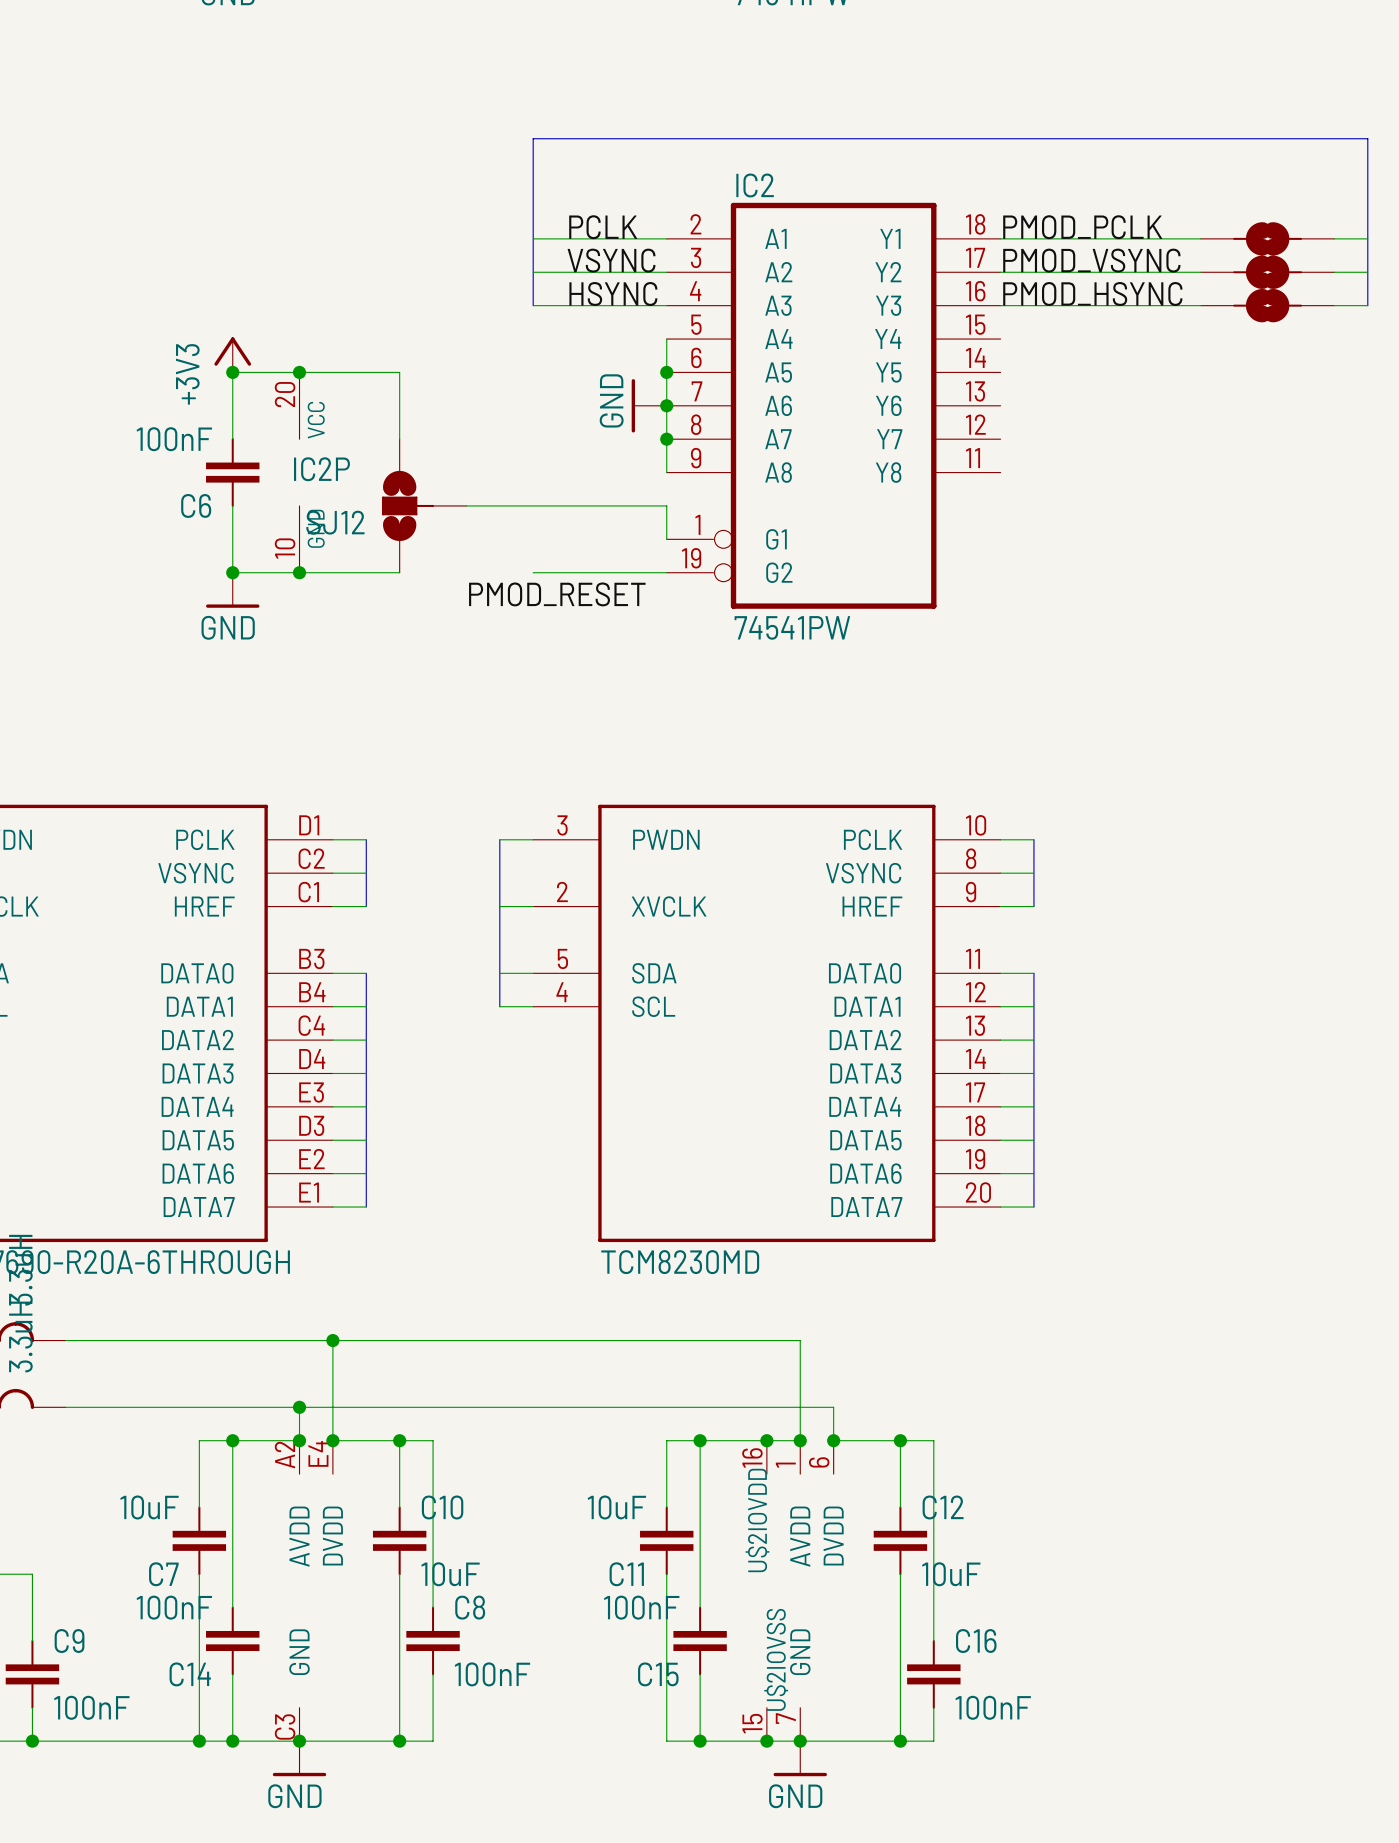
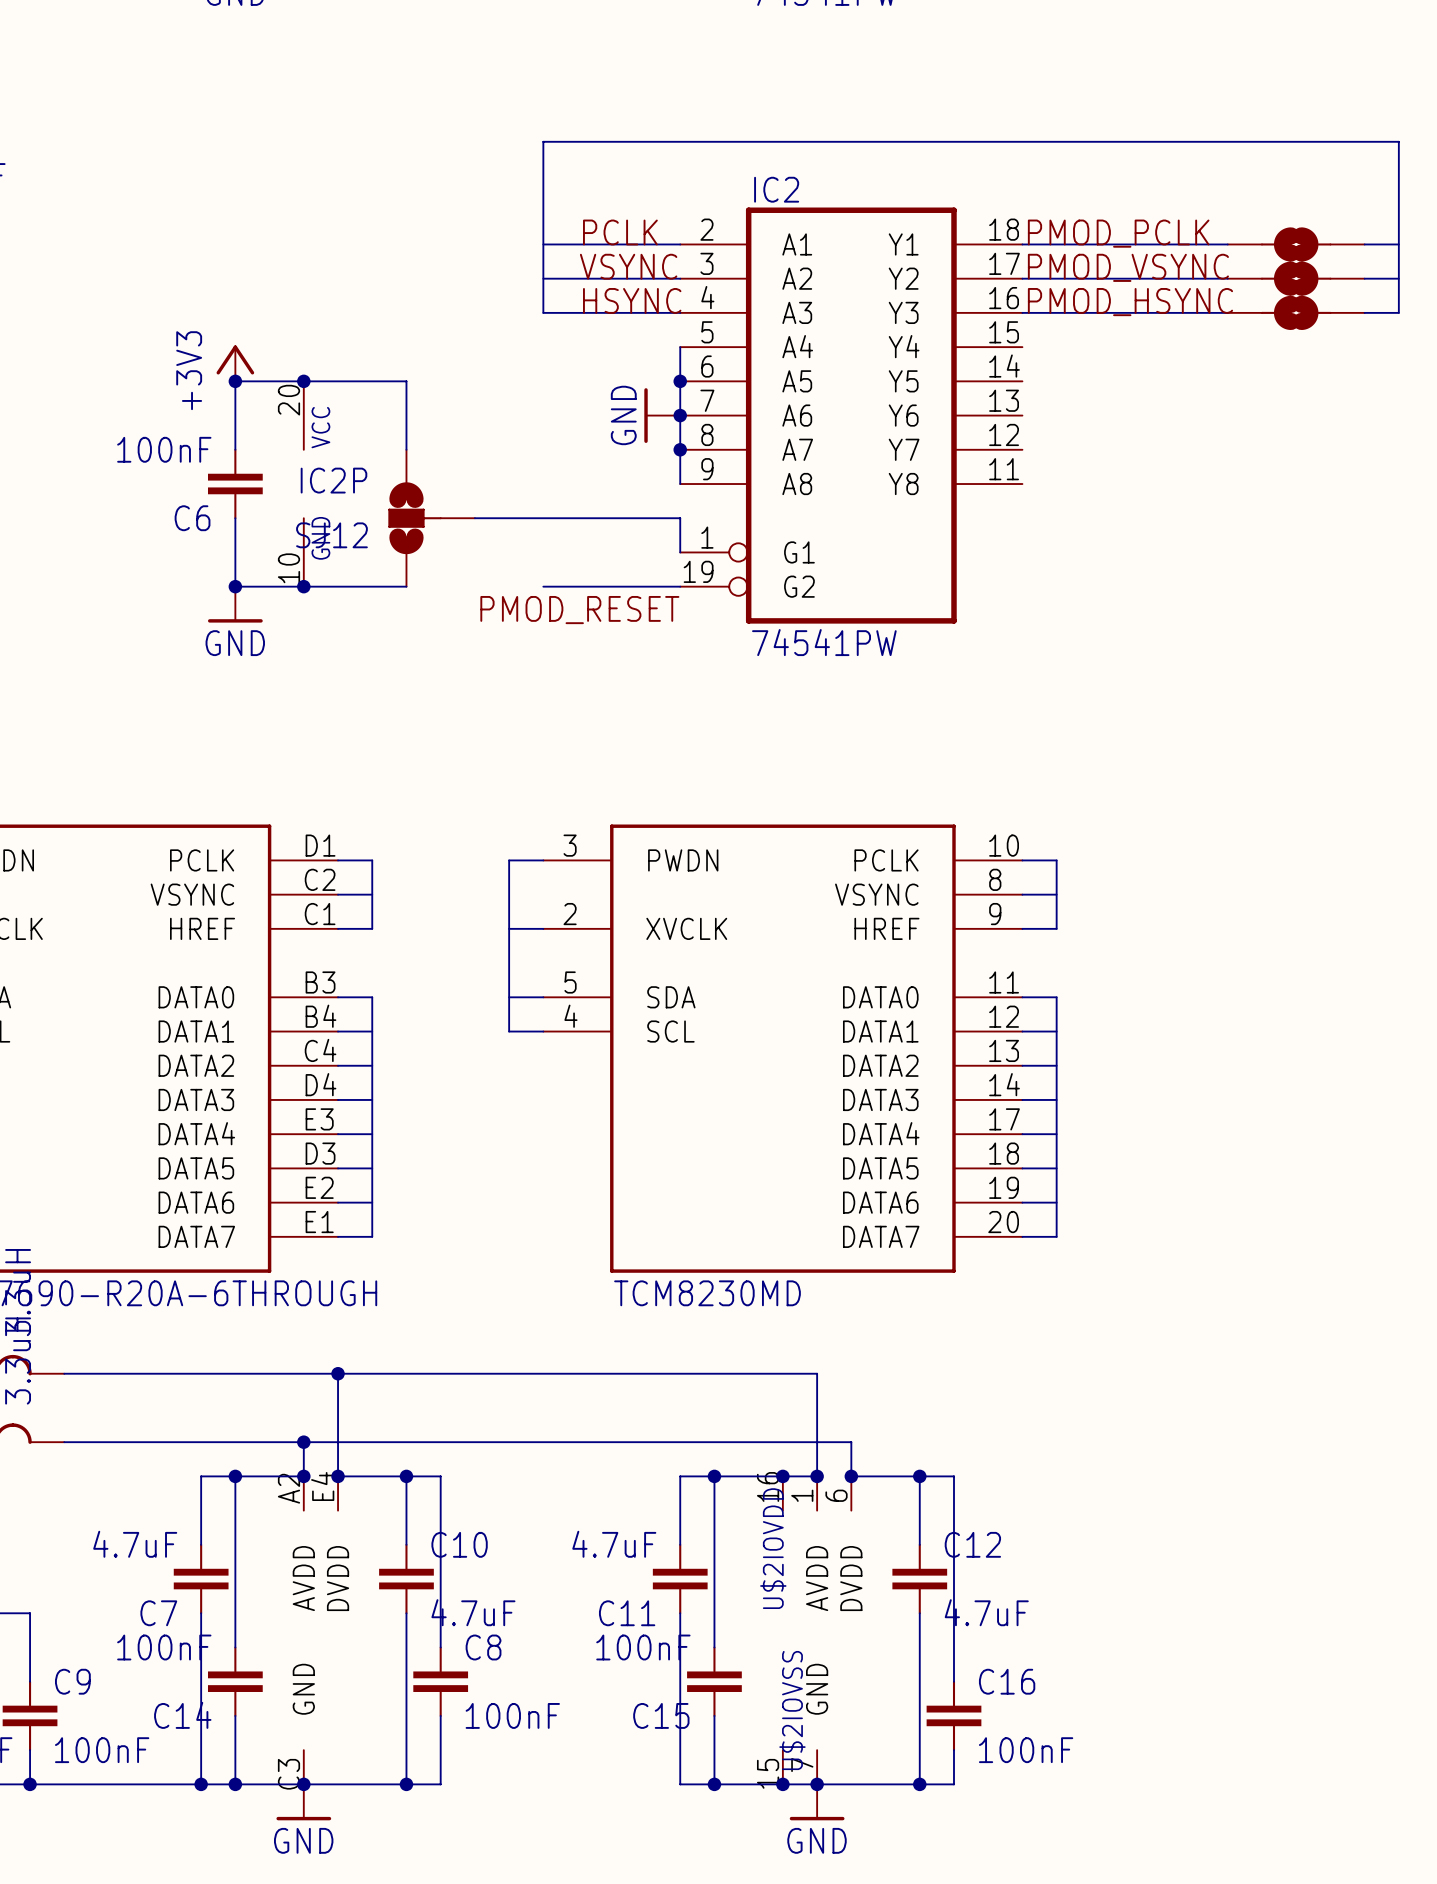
C7 value: 10uF (149, 1507) -> 4.7uF (135, 1544)
C11 value: 10uF (616, 1507) -> 4.7uF (614, 1544)
C10 value: 10uF (450, 1574) -> 4.7uF (473, 1612)
C12 value: 10uF (951, 1574) -> 4.7uF (986, 1612)

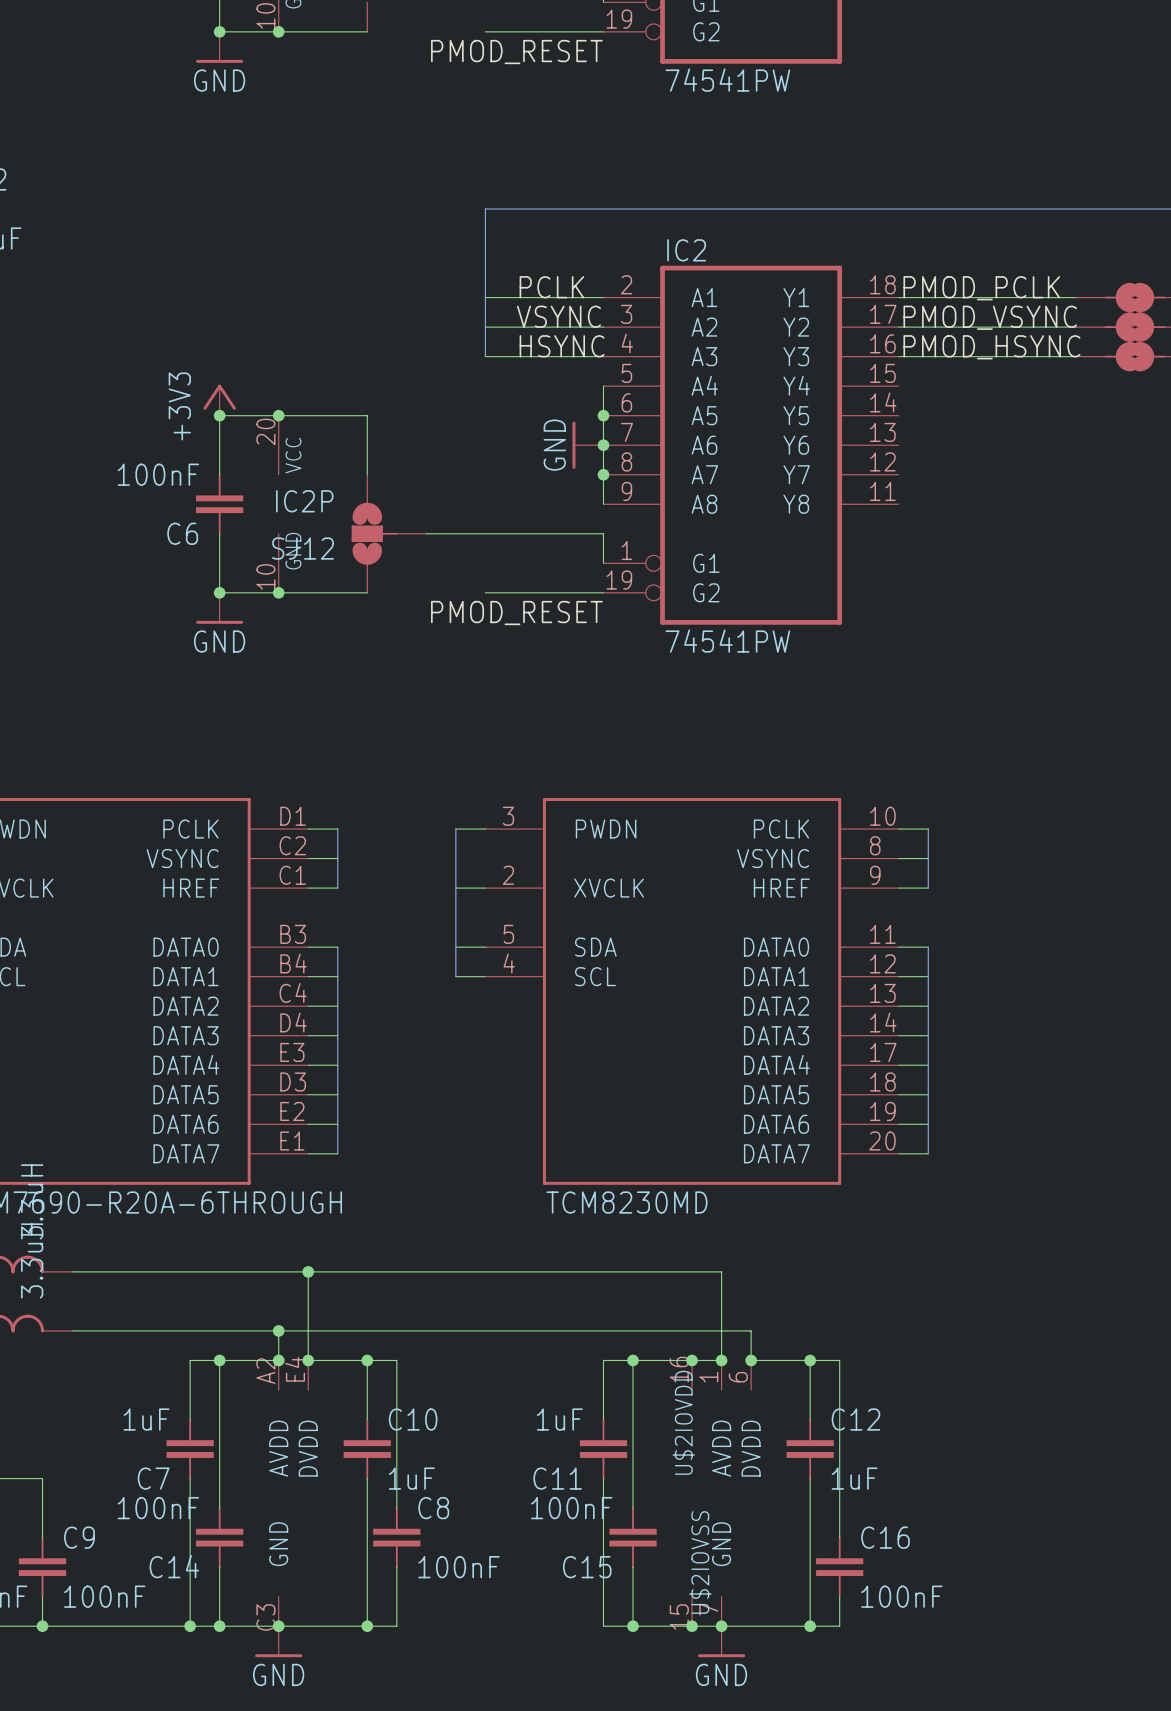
C7 value: 4.7uF (135, 1544) -> 1uF (146, 1419)
C11 value: 4.7uF (614, 1544) -> 1uF (559, 1419)
C10 value: 4.7uF (473, 1612) -> 1uF (411, 1478)
C12 value: 4.7uF (986, 1612) -> 1uF (854, 1478)

